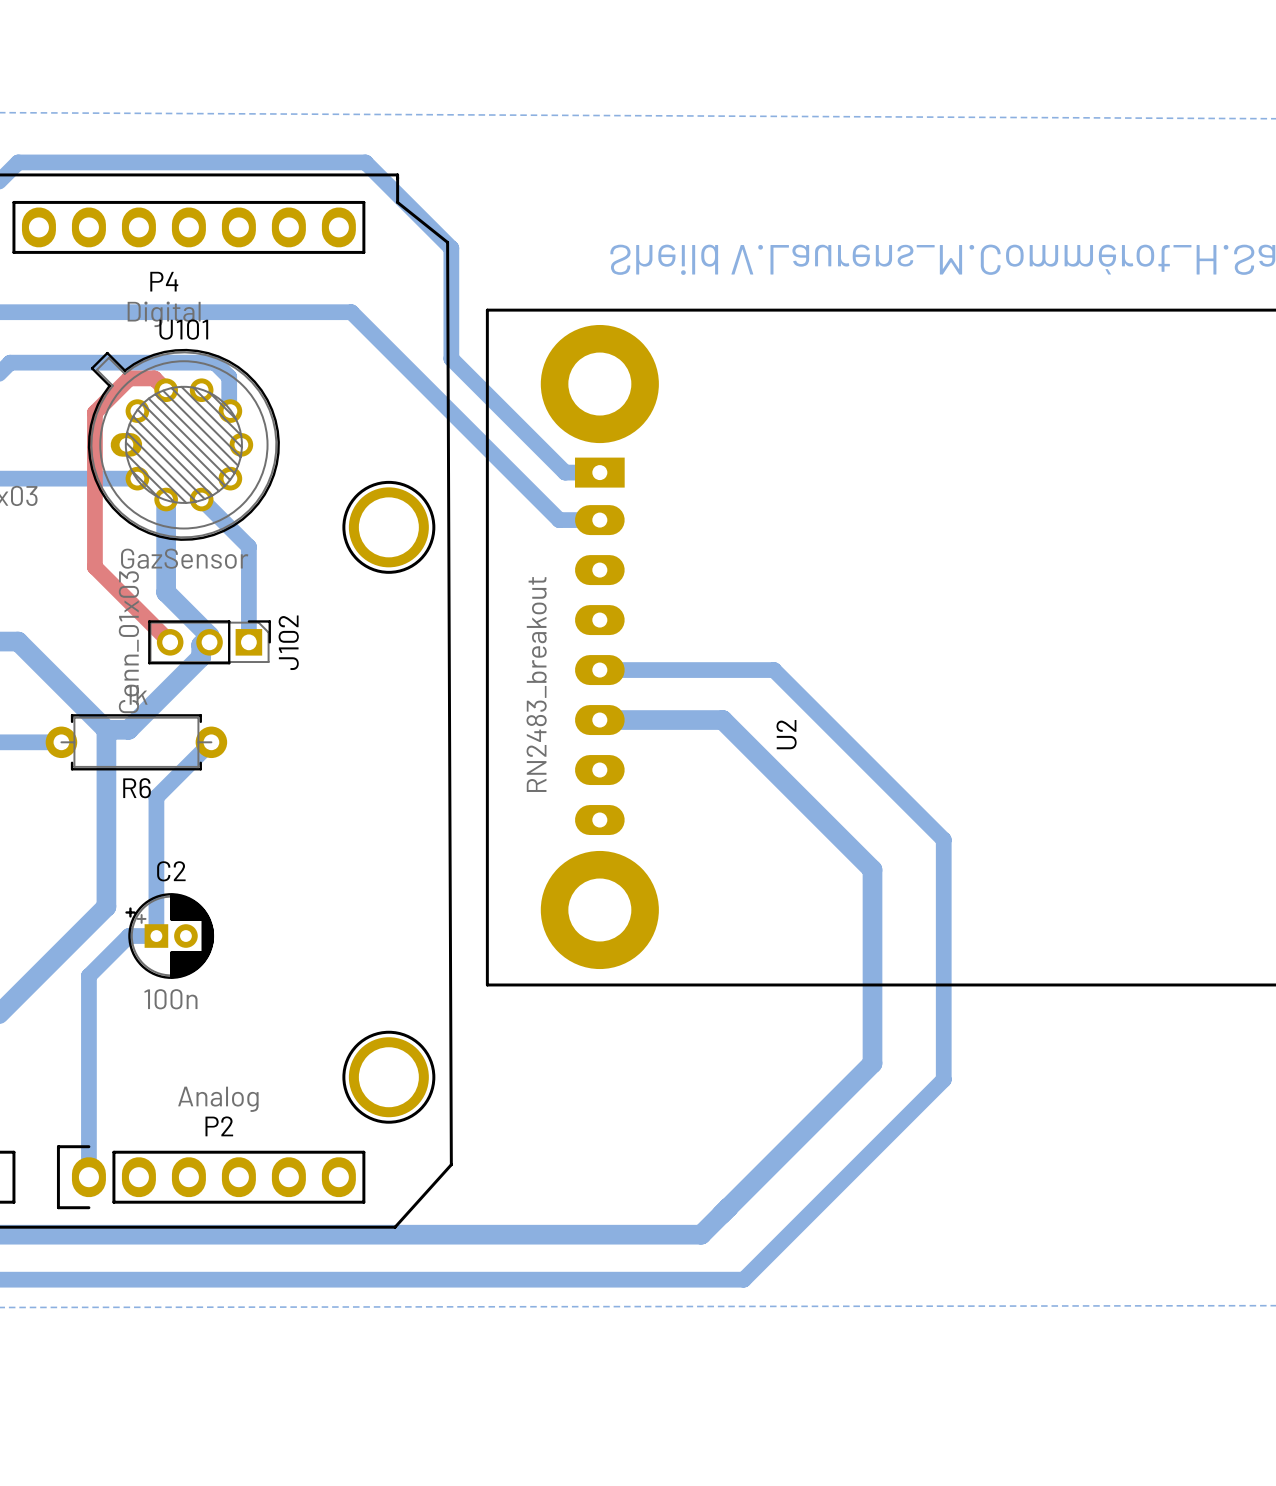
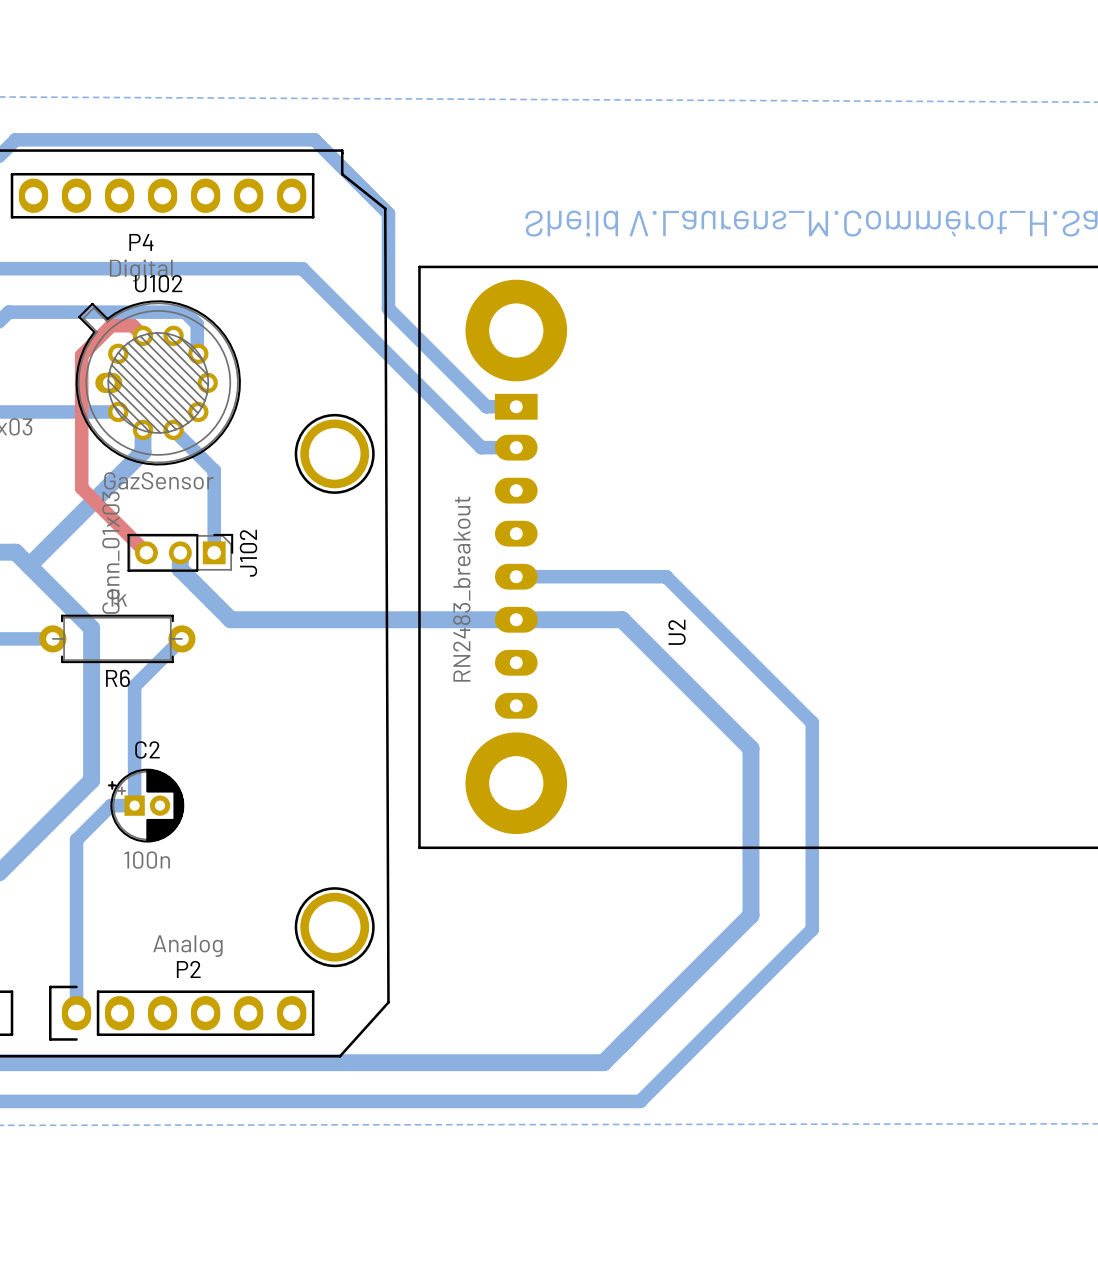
U101 name: U101 (183, 329) -> U102 (158, 283)
bottom track: (166, 525) (166, 592) (209, 635) (209, 642) (203, 642) (201, 645) (201, 657) (128, 729) (106, 729) -> (142, 451) (29, 565)
bottom track: none -> (180, 552) (180, 569) (230, 619) (516, 619)

